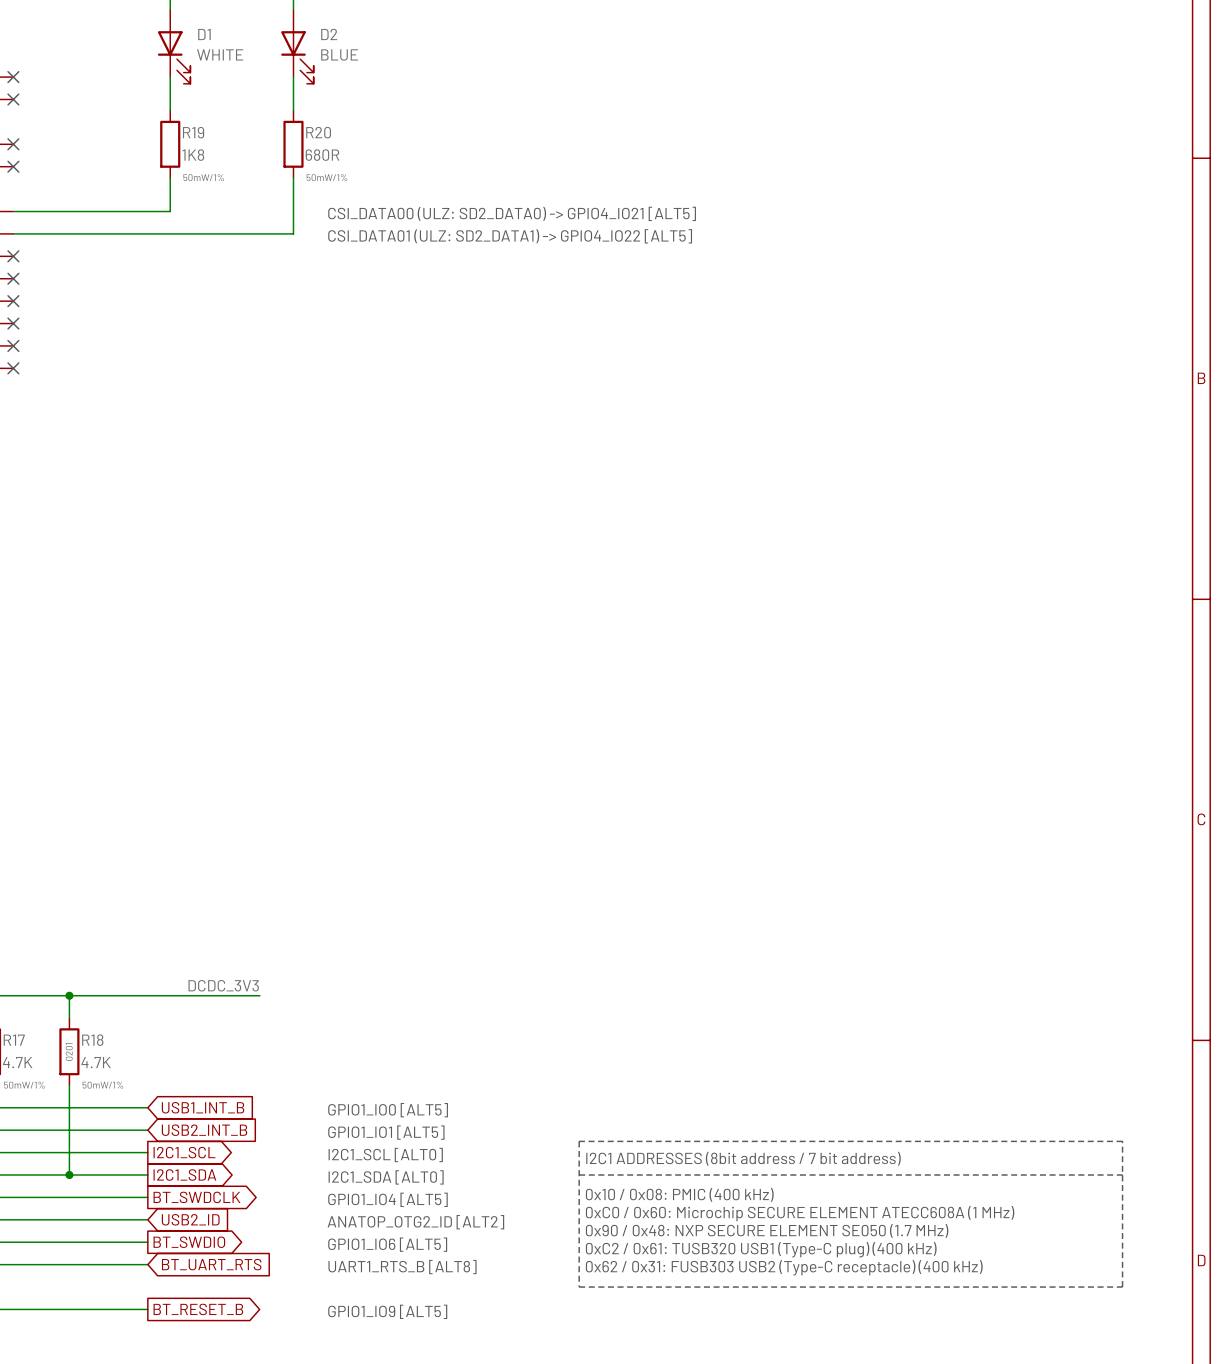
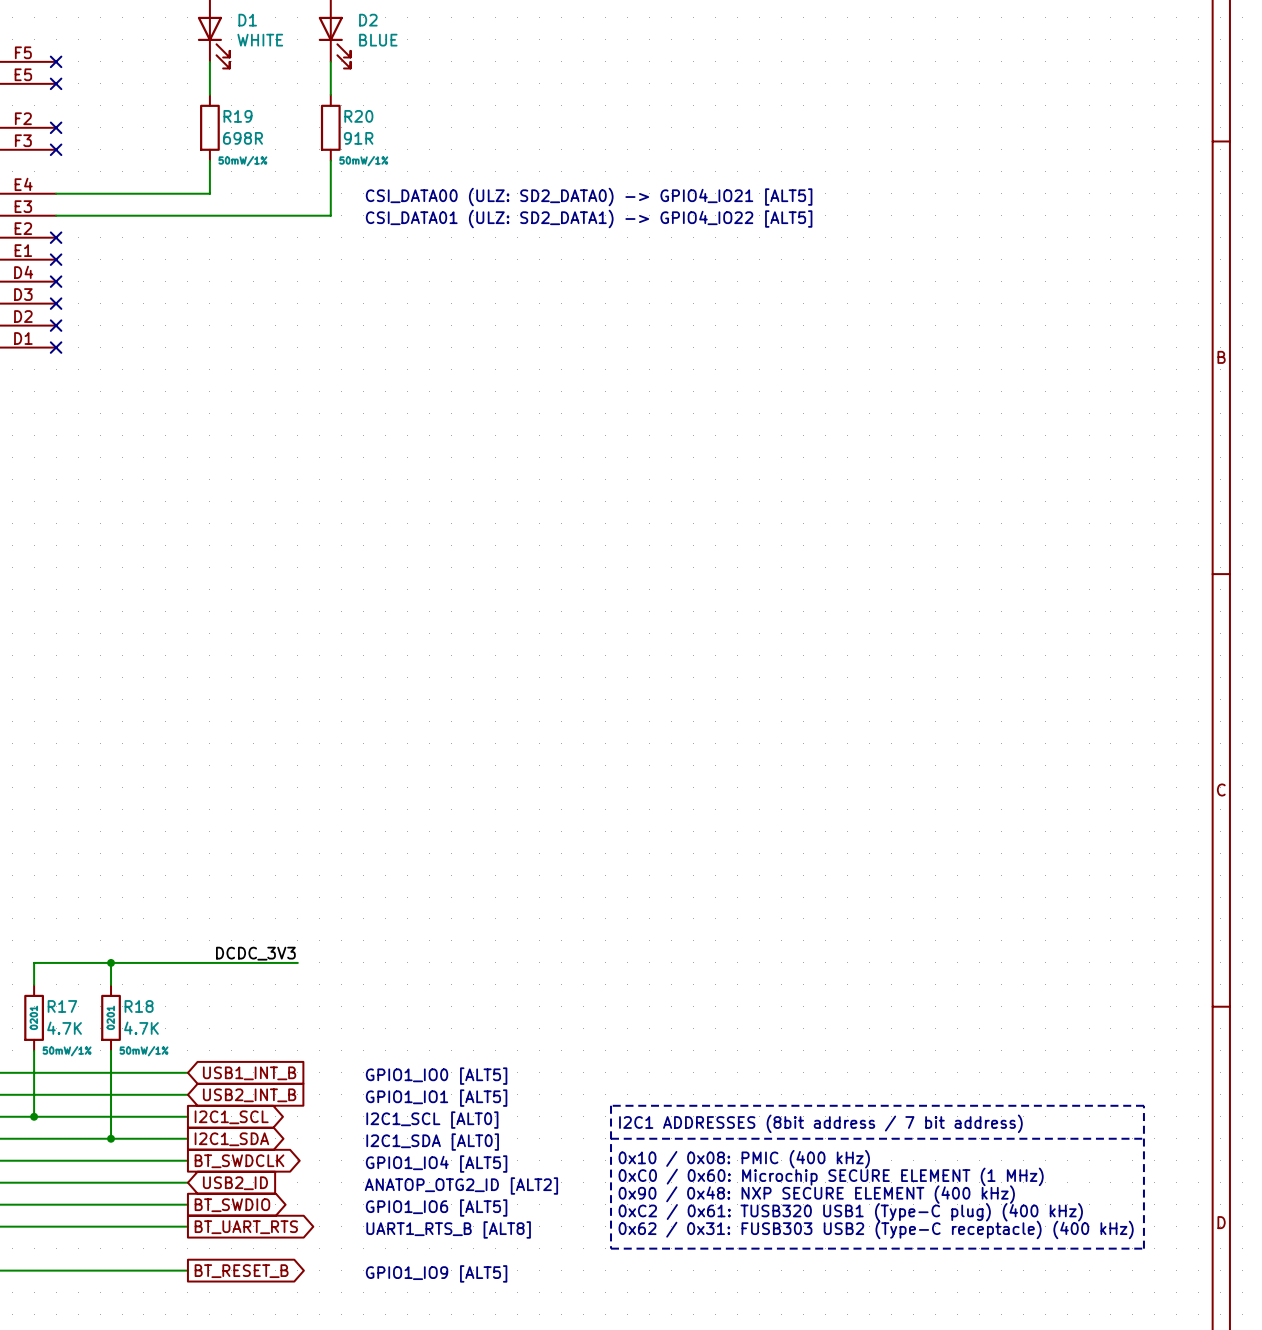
R19 value: 1K8 (193, 155) -> 698R (242, 138)
R20 value: 680R (322, 155) -> 91R (358, 138)
text: 0xC0 / 0x60: Microchip SECURE ELEMENT ATECC608A (1 MHz) (800, 1213) -> 0xC0 / 0x60: Microchip SECURE ELEMENT (1 MHz) (831, 1176)
text: 0x90 / 0x48: NXP SECURE ELEMENT SE050 (1.7 MHz) (767, 1230) -> 0x90 / 0x48: NXP SECURE ELEMENT (400 kHz) (816, 1194)
global label shape: input (211, 1264) -> output (246, 1227)

